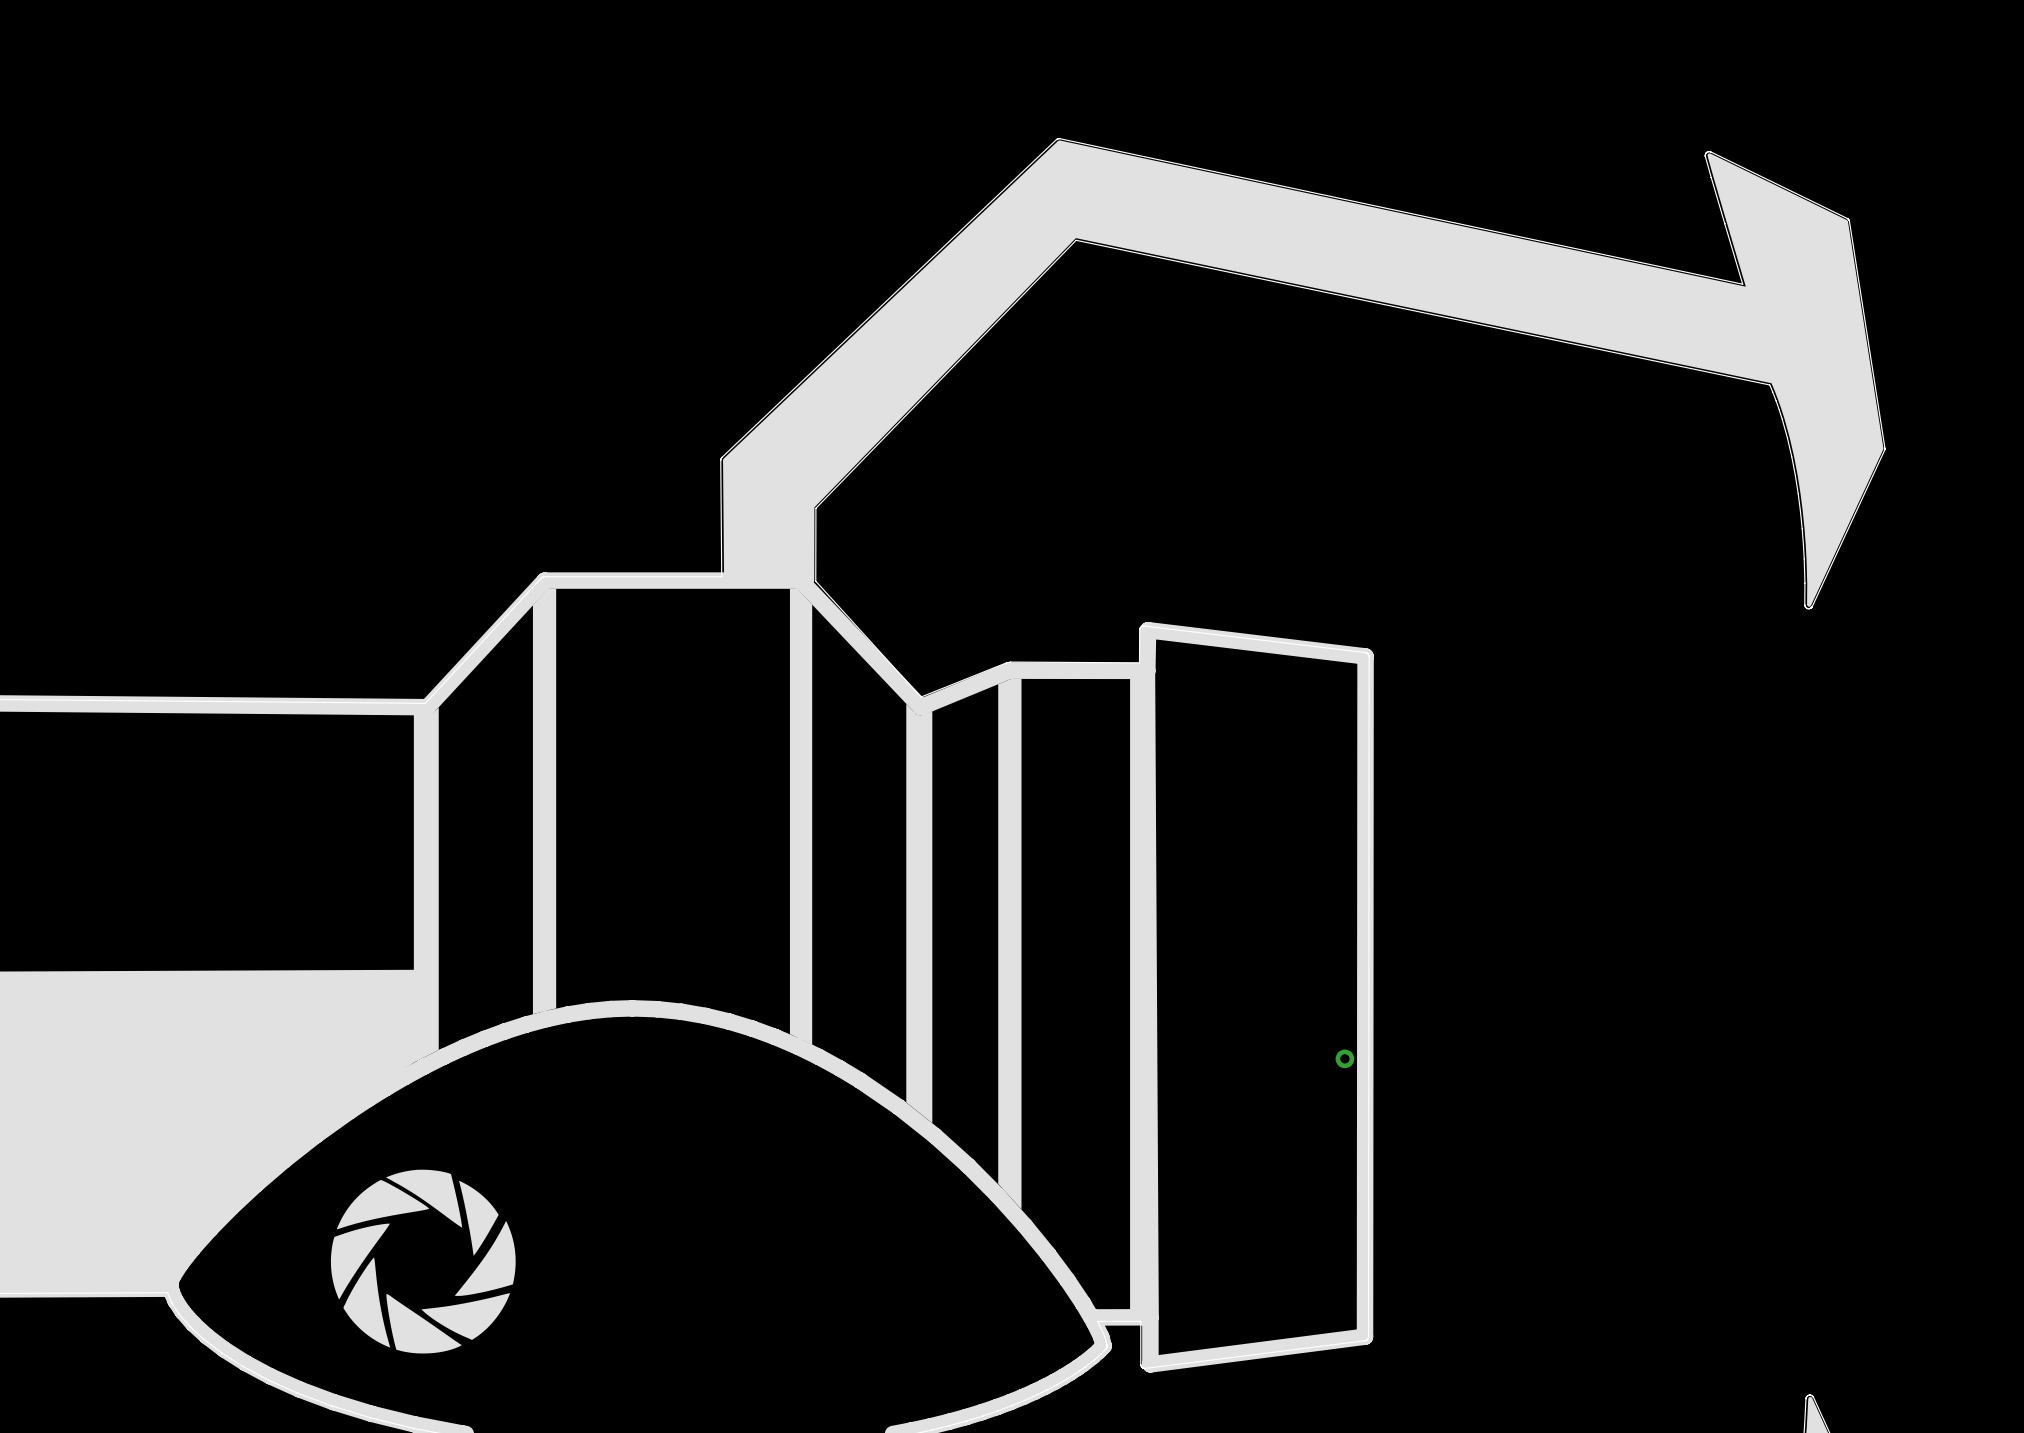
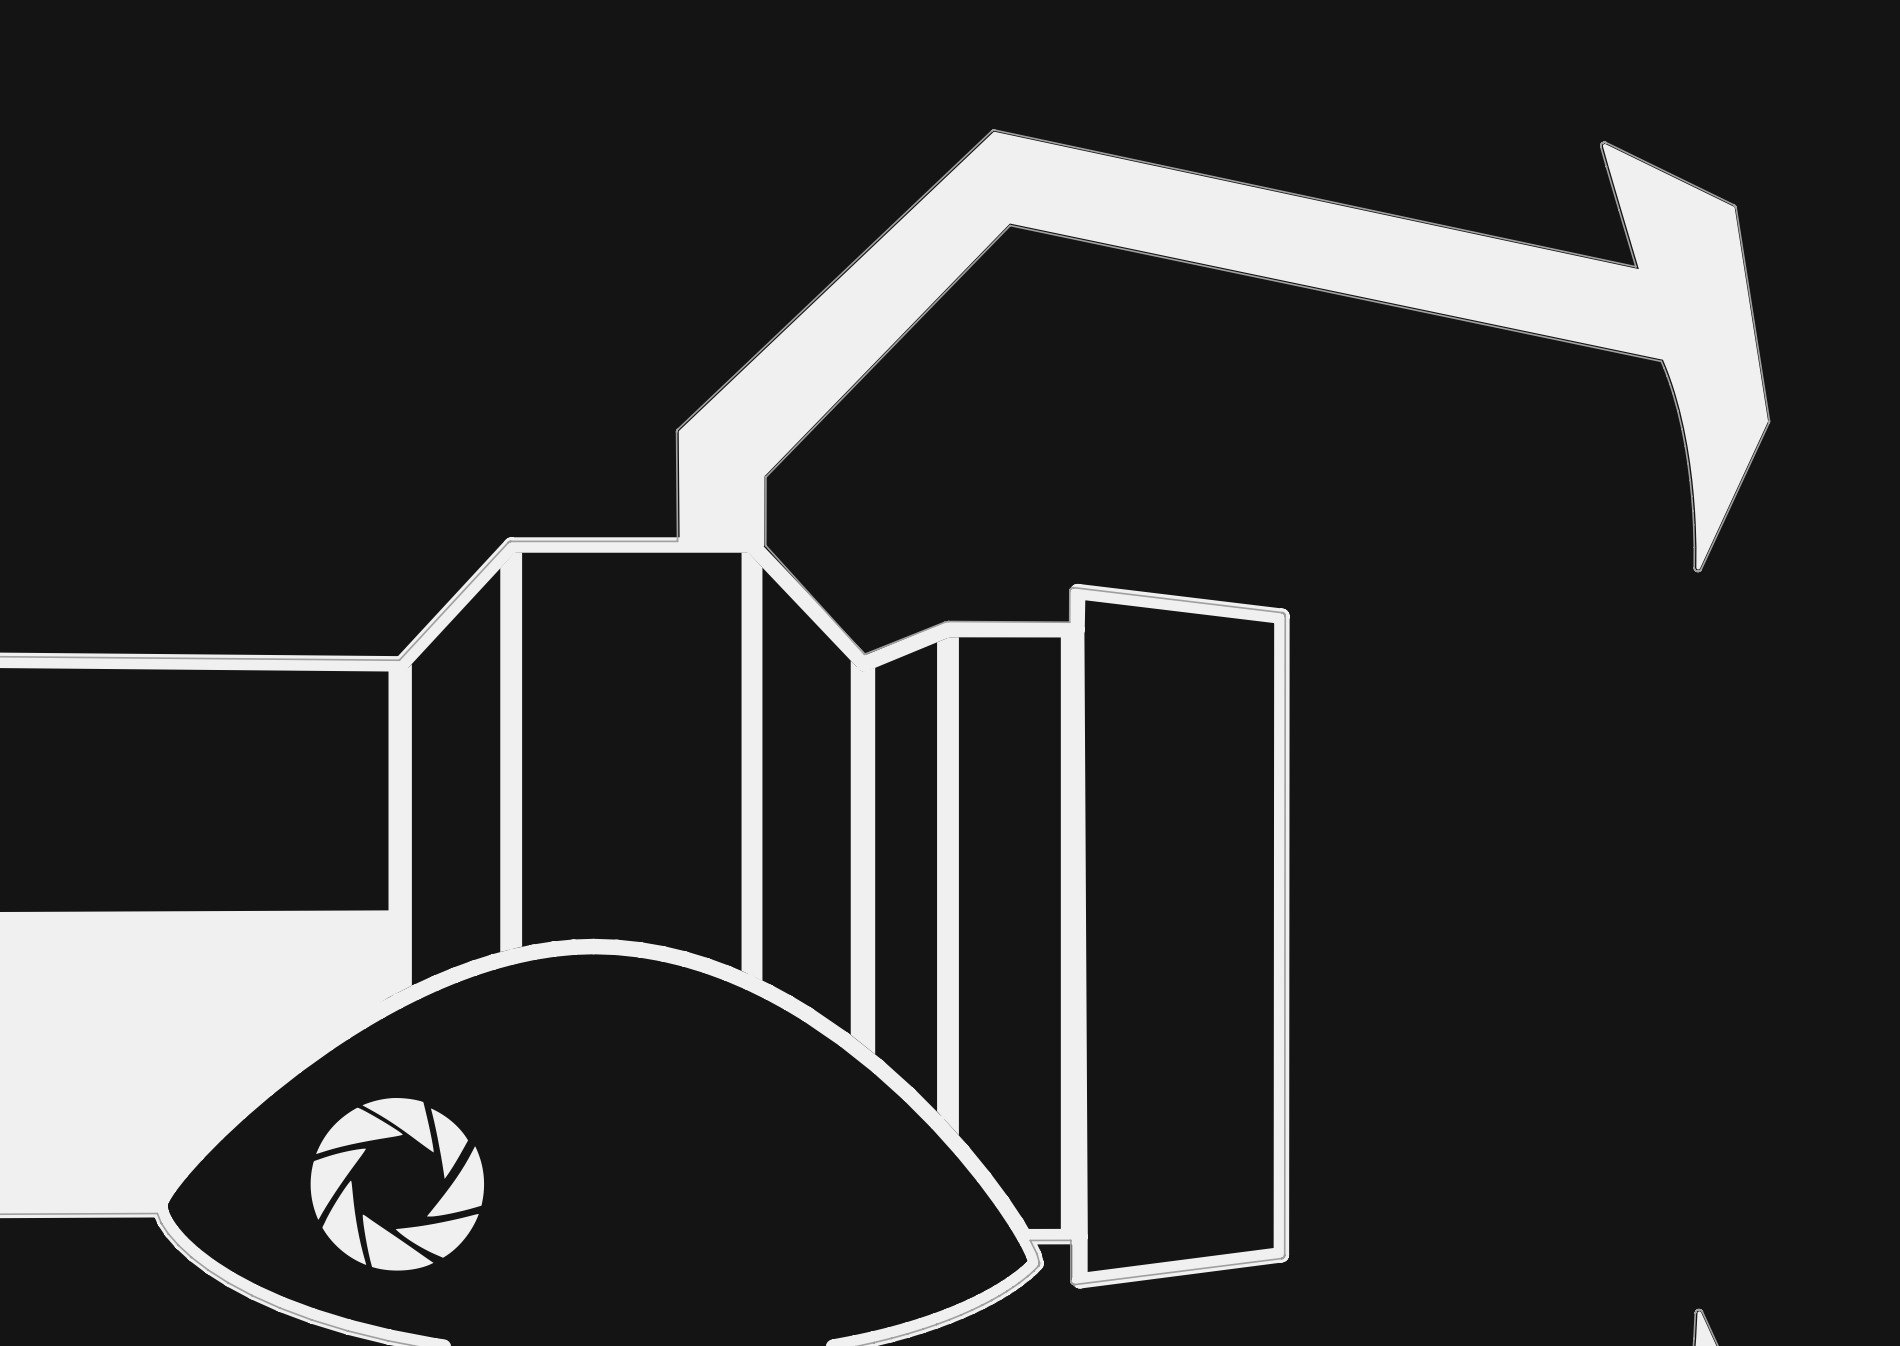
via: (1344, 1058) -> none

